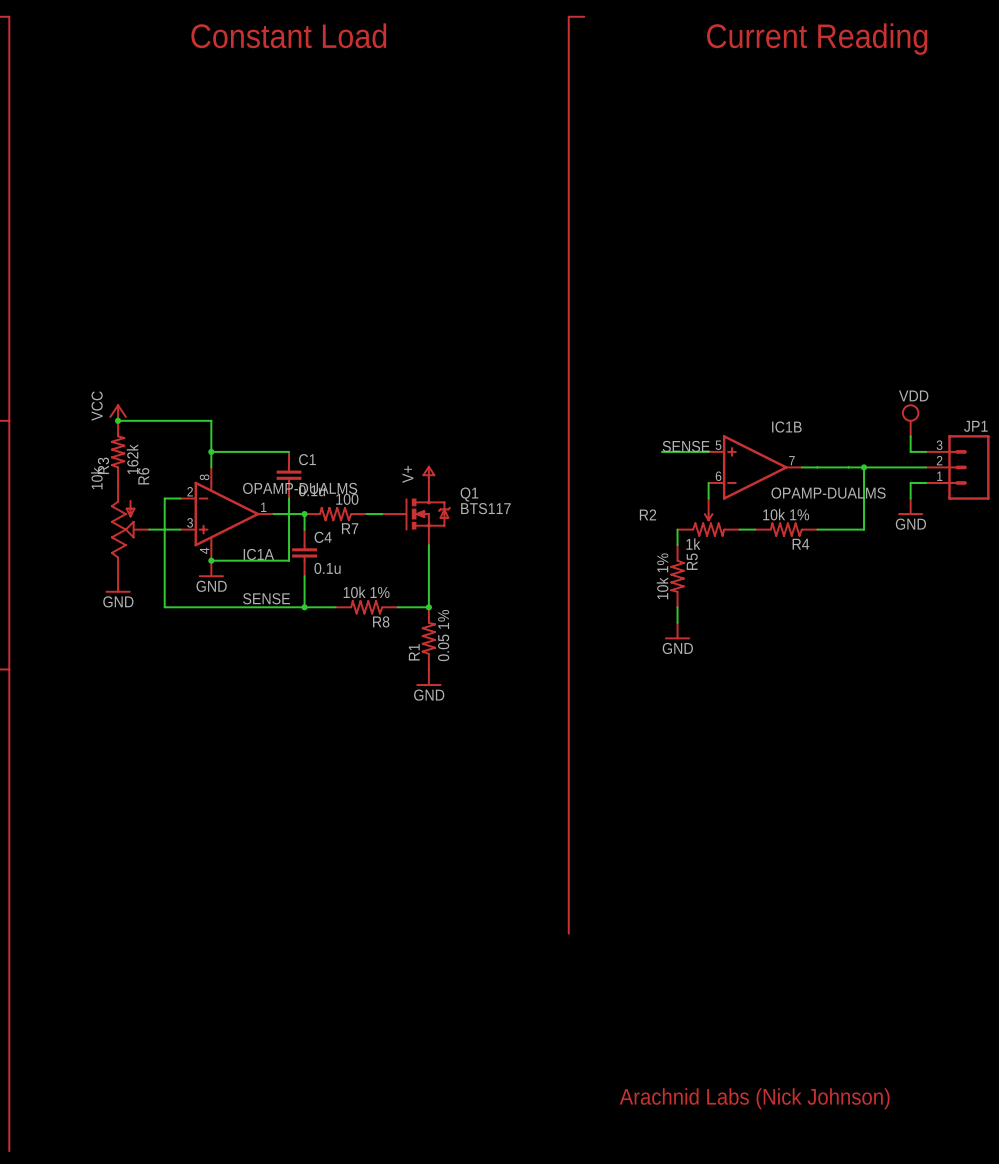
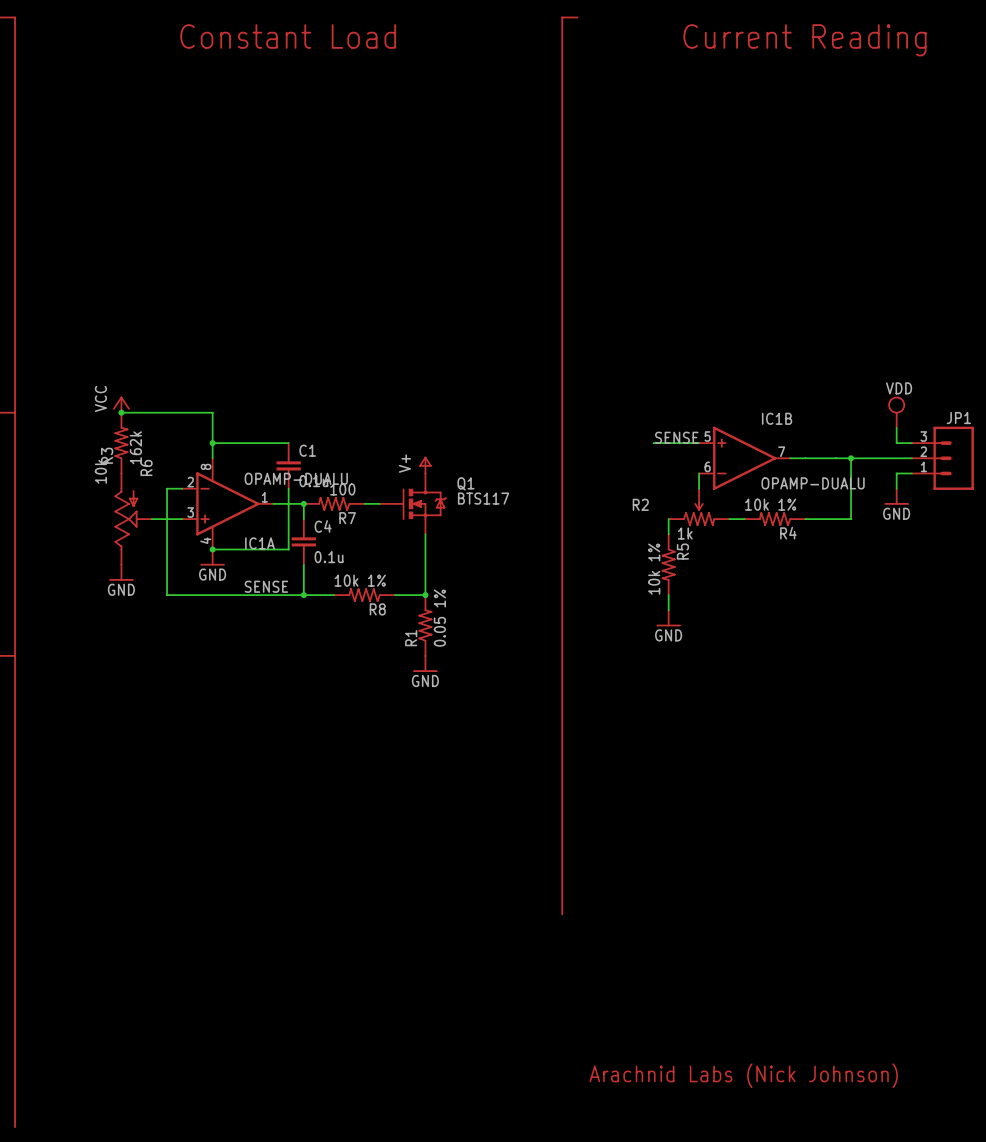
IC1A value: OPAMP-DUALMS (300, 488) -> OPAMP-DUALU (296, 478)
IC1B value: OPAMP-DUALMS (828, 493) -> OPAMP-DUALU (813, 483)

